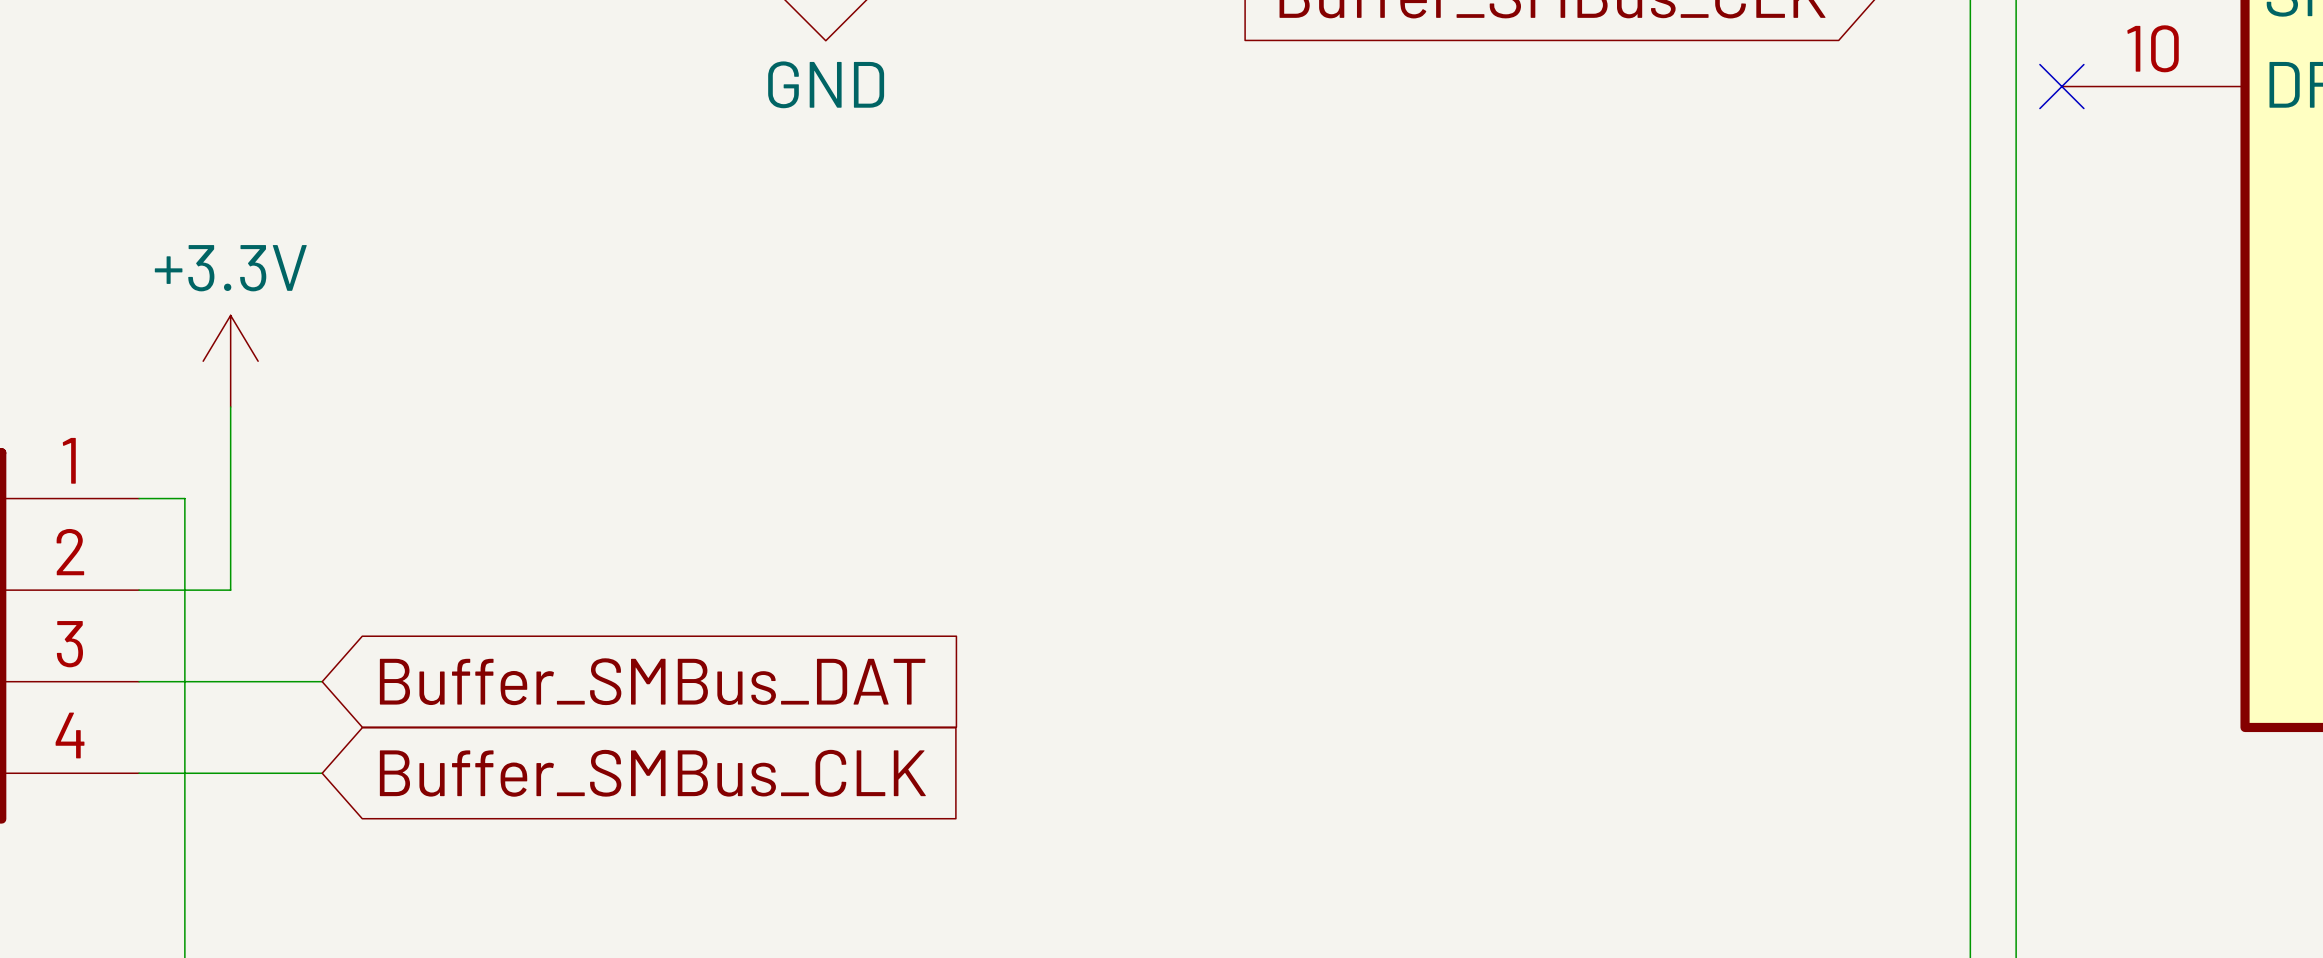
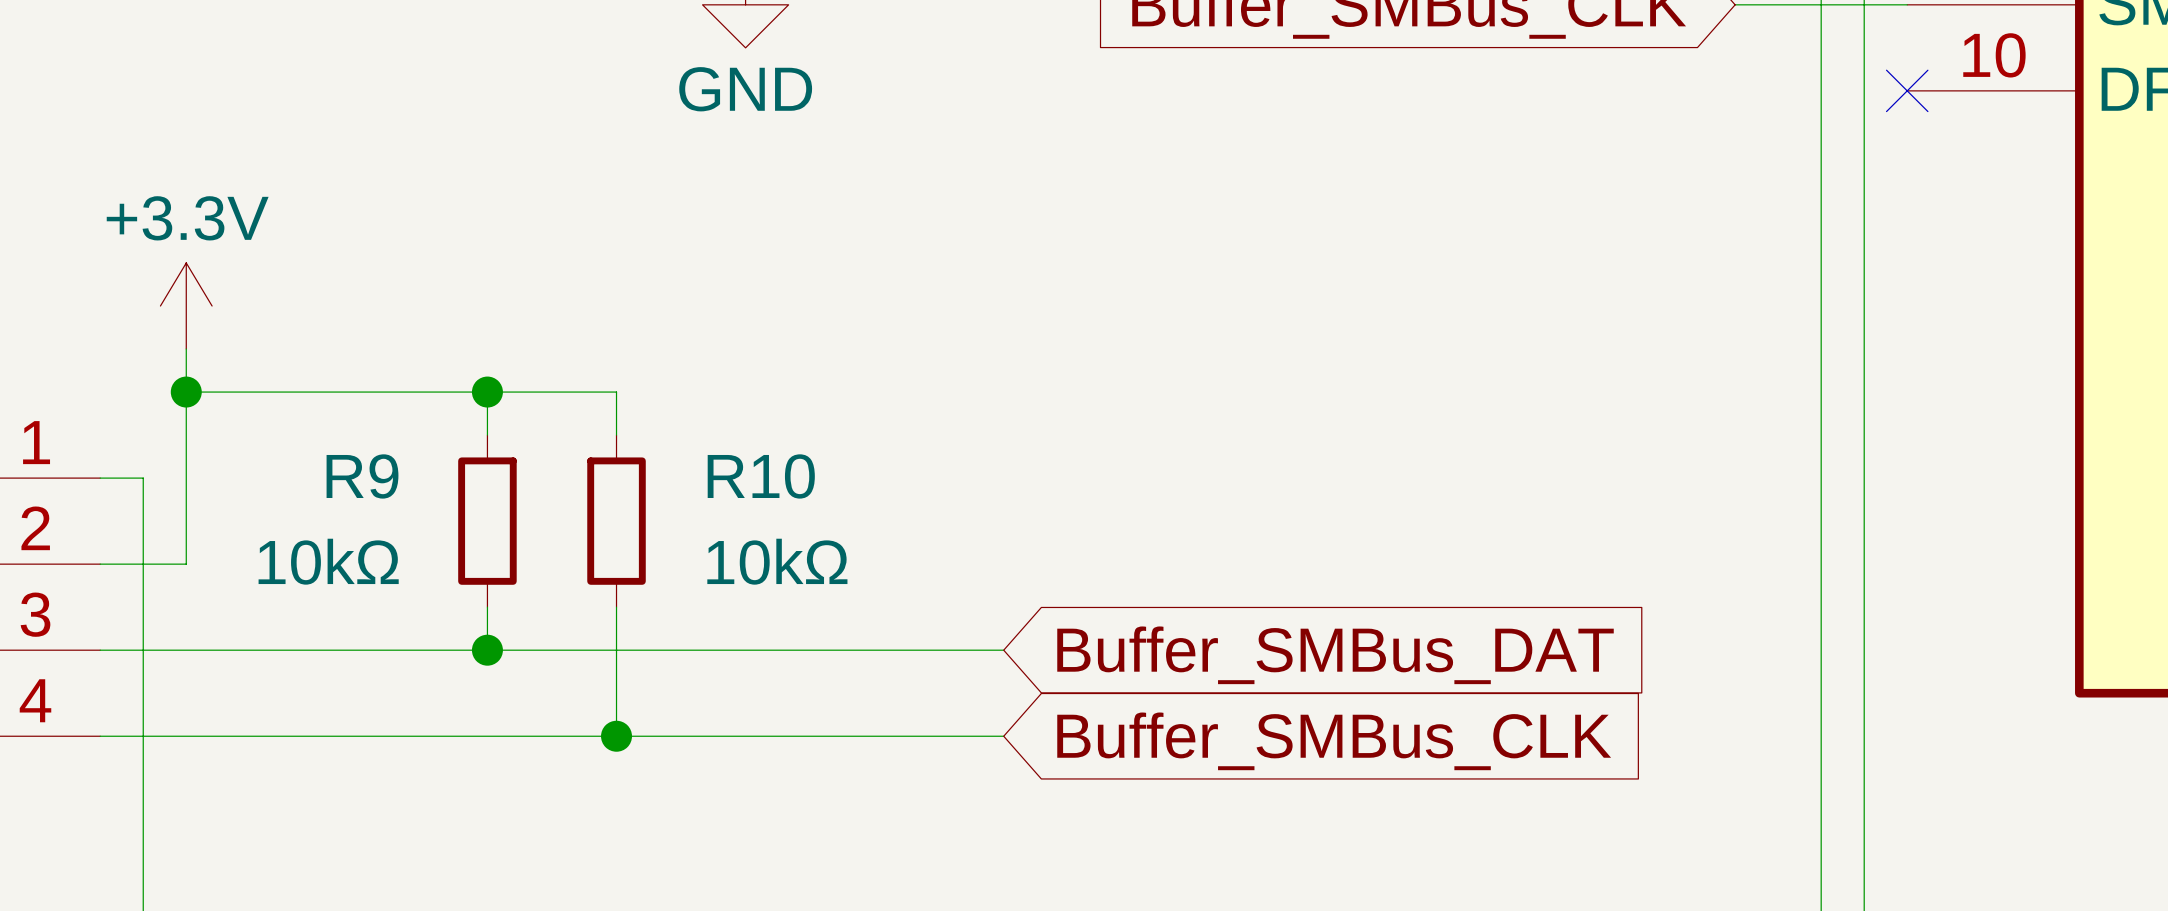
wire: none -> (186, 349) (186, 392) (616, 392) (616, 435)
power symbol position: +3.3V (230, 361) -> +3.3V (186, 306)
junction: none -> (186, 392)
wire: none -> (487, 392) (487, 435)
junction: none -> (487, 392)
R9: none -> 10kΩ (487, 521)
R10: none -> 10kΩ (616, 521)
wire: none -> (487, 607) (487, 650)
wire: none -> (616, 607) (616, 736)
wire: none -> (272, 650) (1003, 650)
junction: none -> (487, 650)
global label position: Buffer_SMBus_DAT (652, 681) -> Buffer_SMBus_DAT (1335, 655)
wire: none -> (272, 736) (1003, 736)
global label position: Buffer_SMBus_CLK (652, 773) -> Buffer_SMBus_CLK (1334, 741)
junction: none -> (616, 736)

